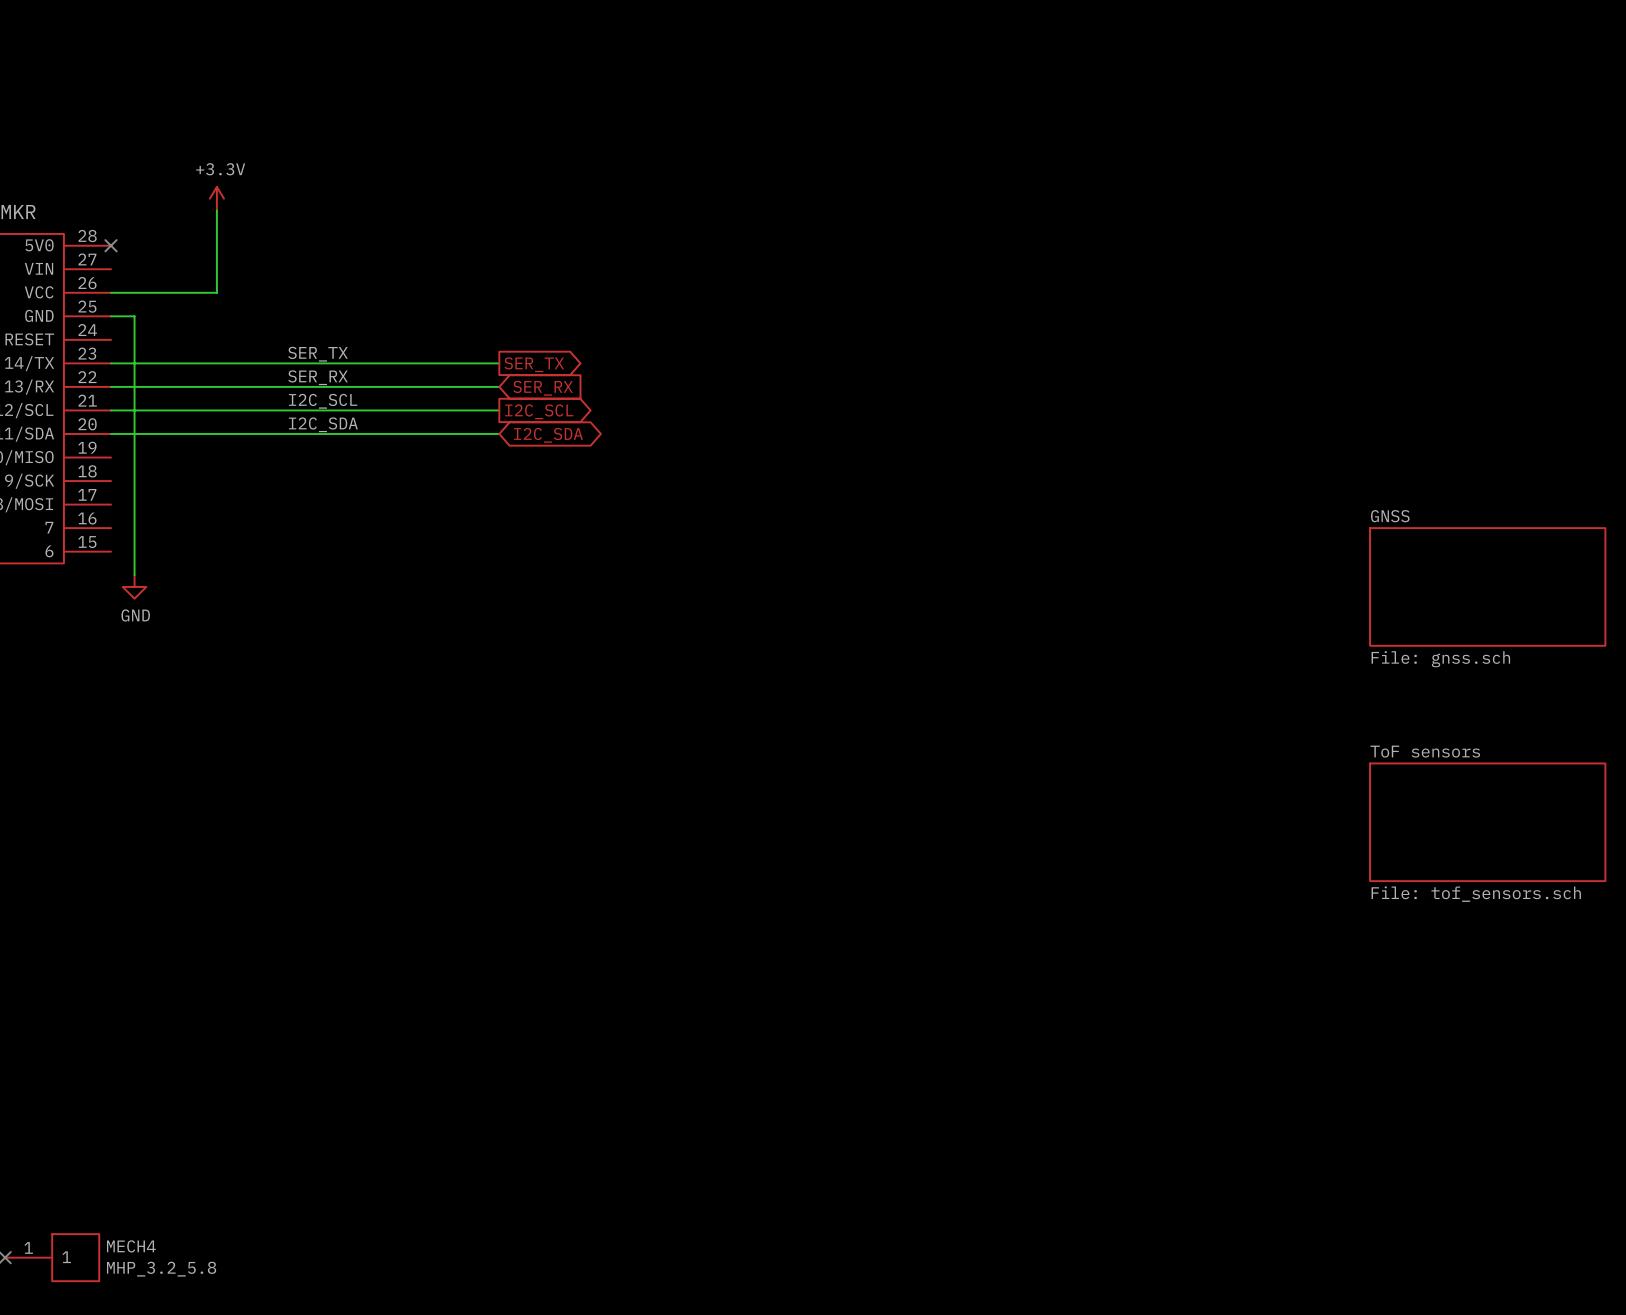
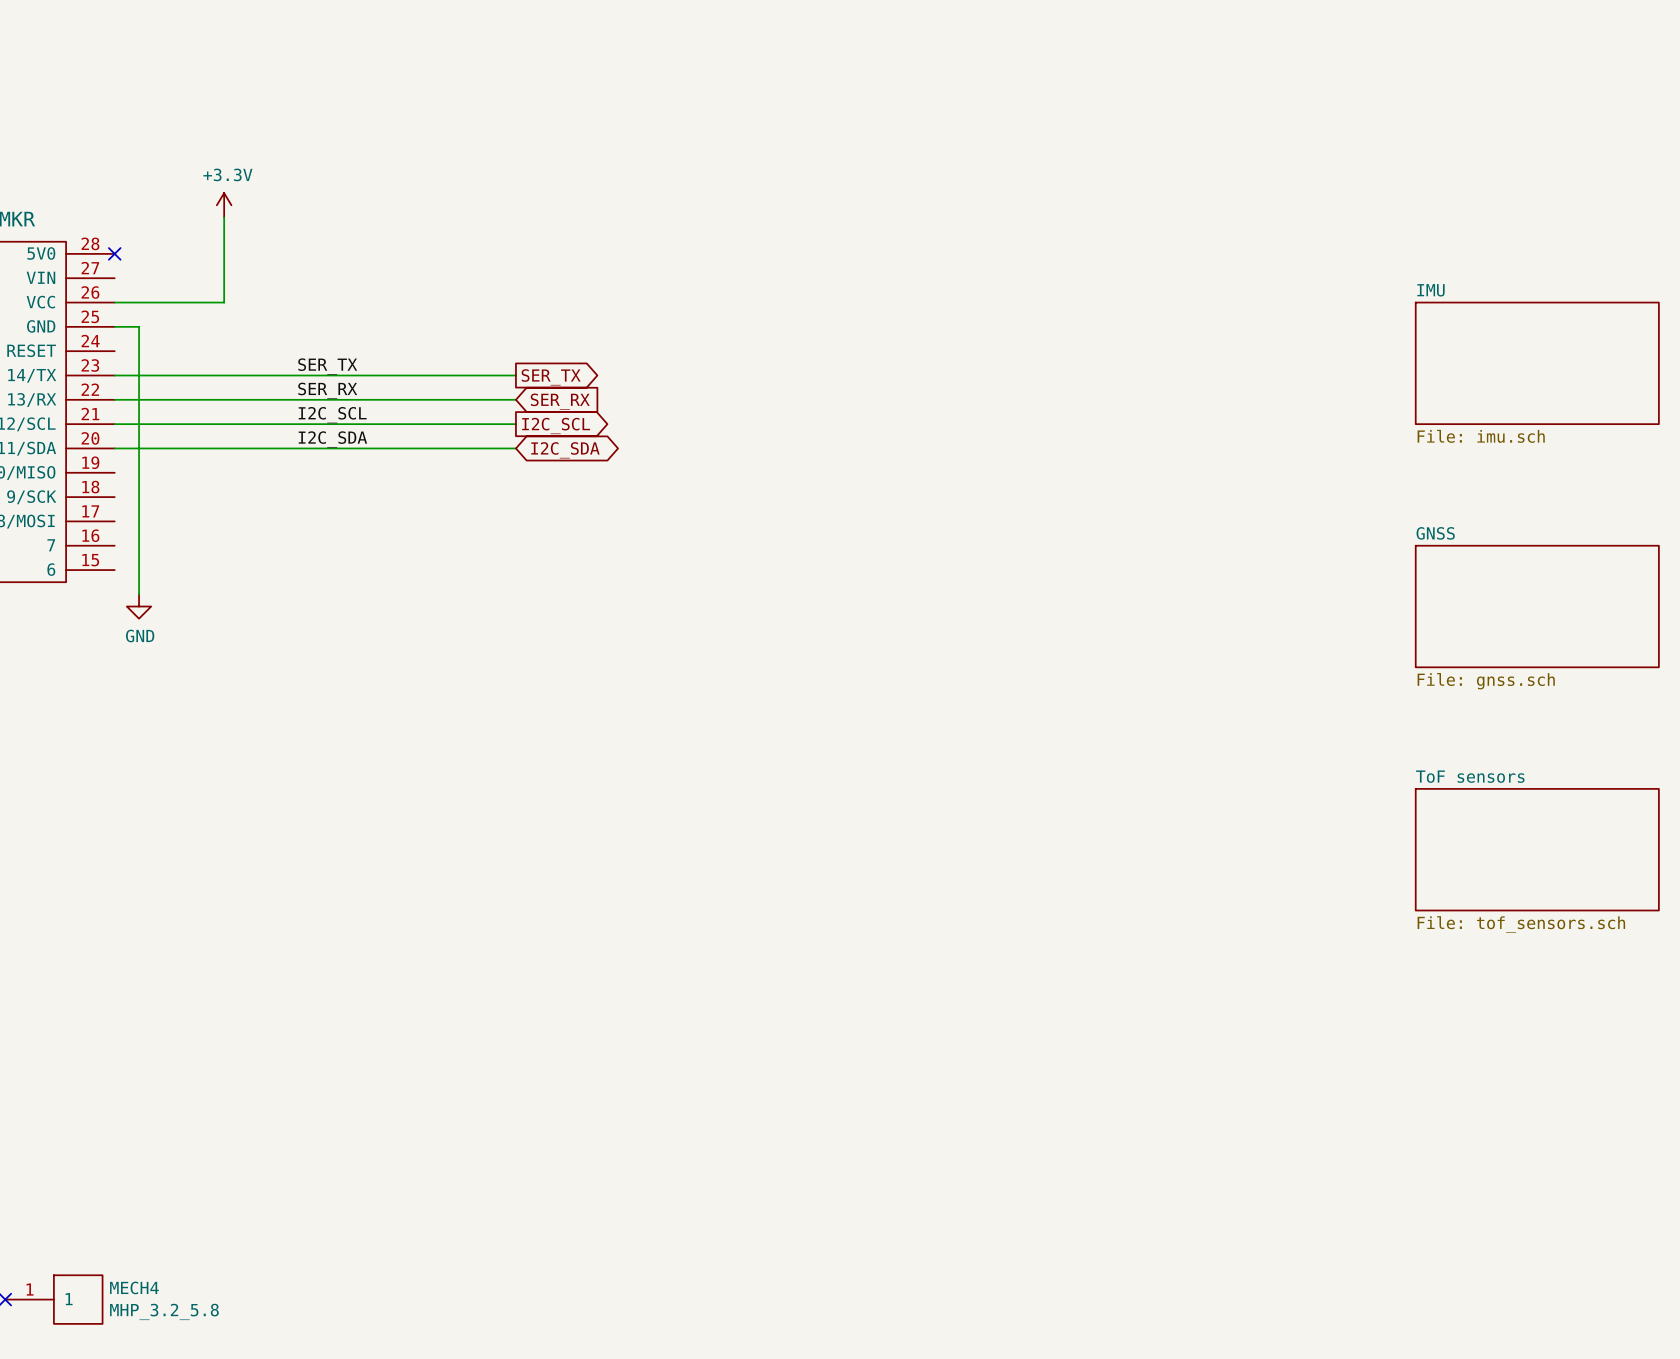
sheet IMU: none -> File: imu.sch (1537, 363)

